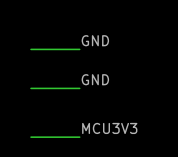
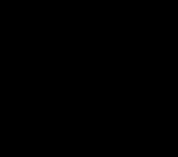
label: GND (95, 40) -> none
wire: (30, 49) (79, 49) -> none
label: GND (95, 79) -> none
wire: (30, 88) (79, 88) -> none
label: MCU3V3 (109, 128) -> none
wire: (30, 137) (79, 137) -> none

